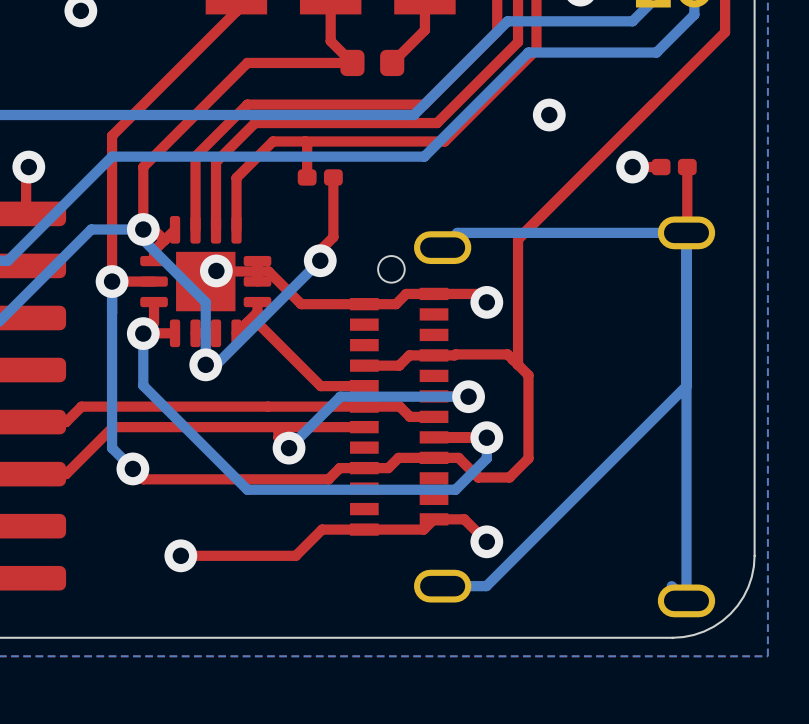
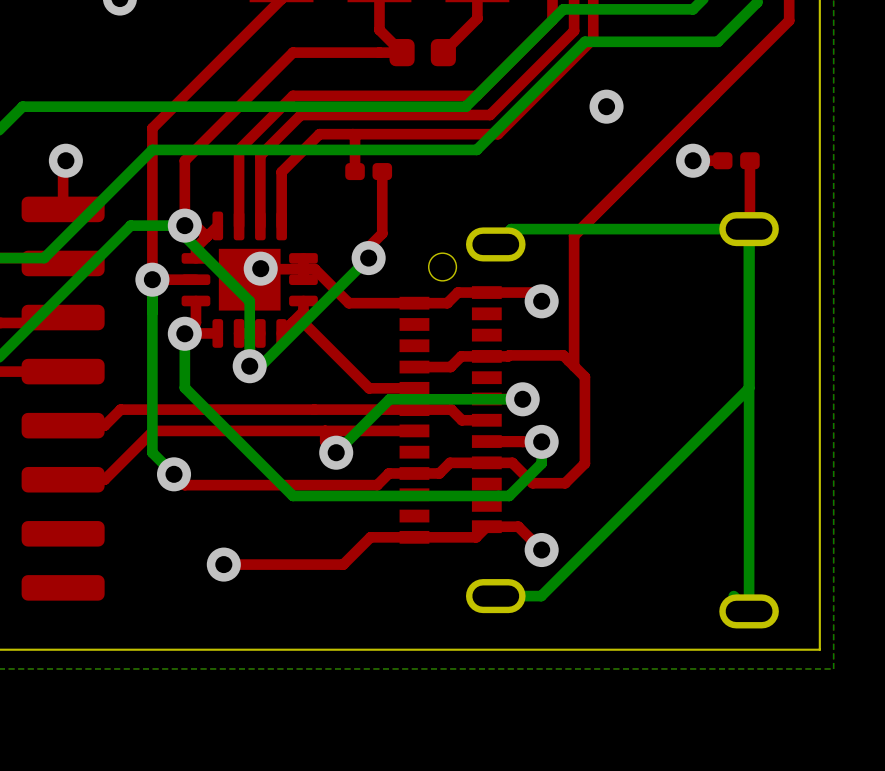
board edge: (754, 555) (748, 587) (730, 613) (704, 631) (672, 637) -> (819, 564) (819, 649) (734, 649)

